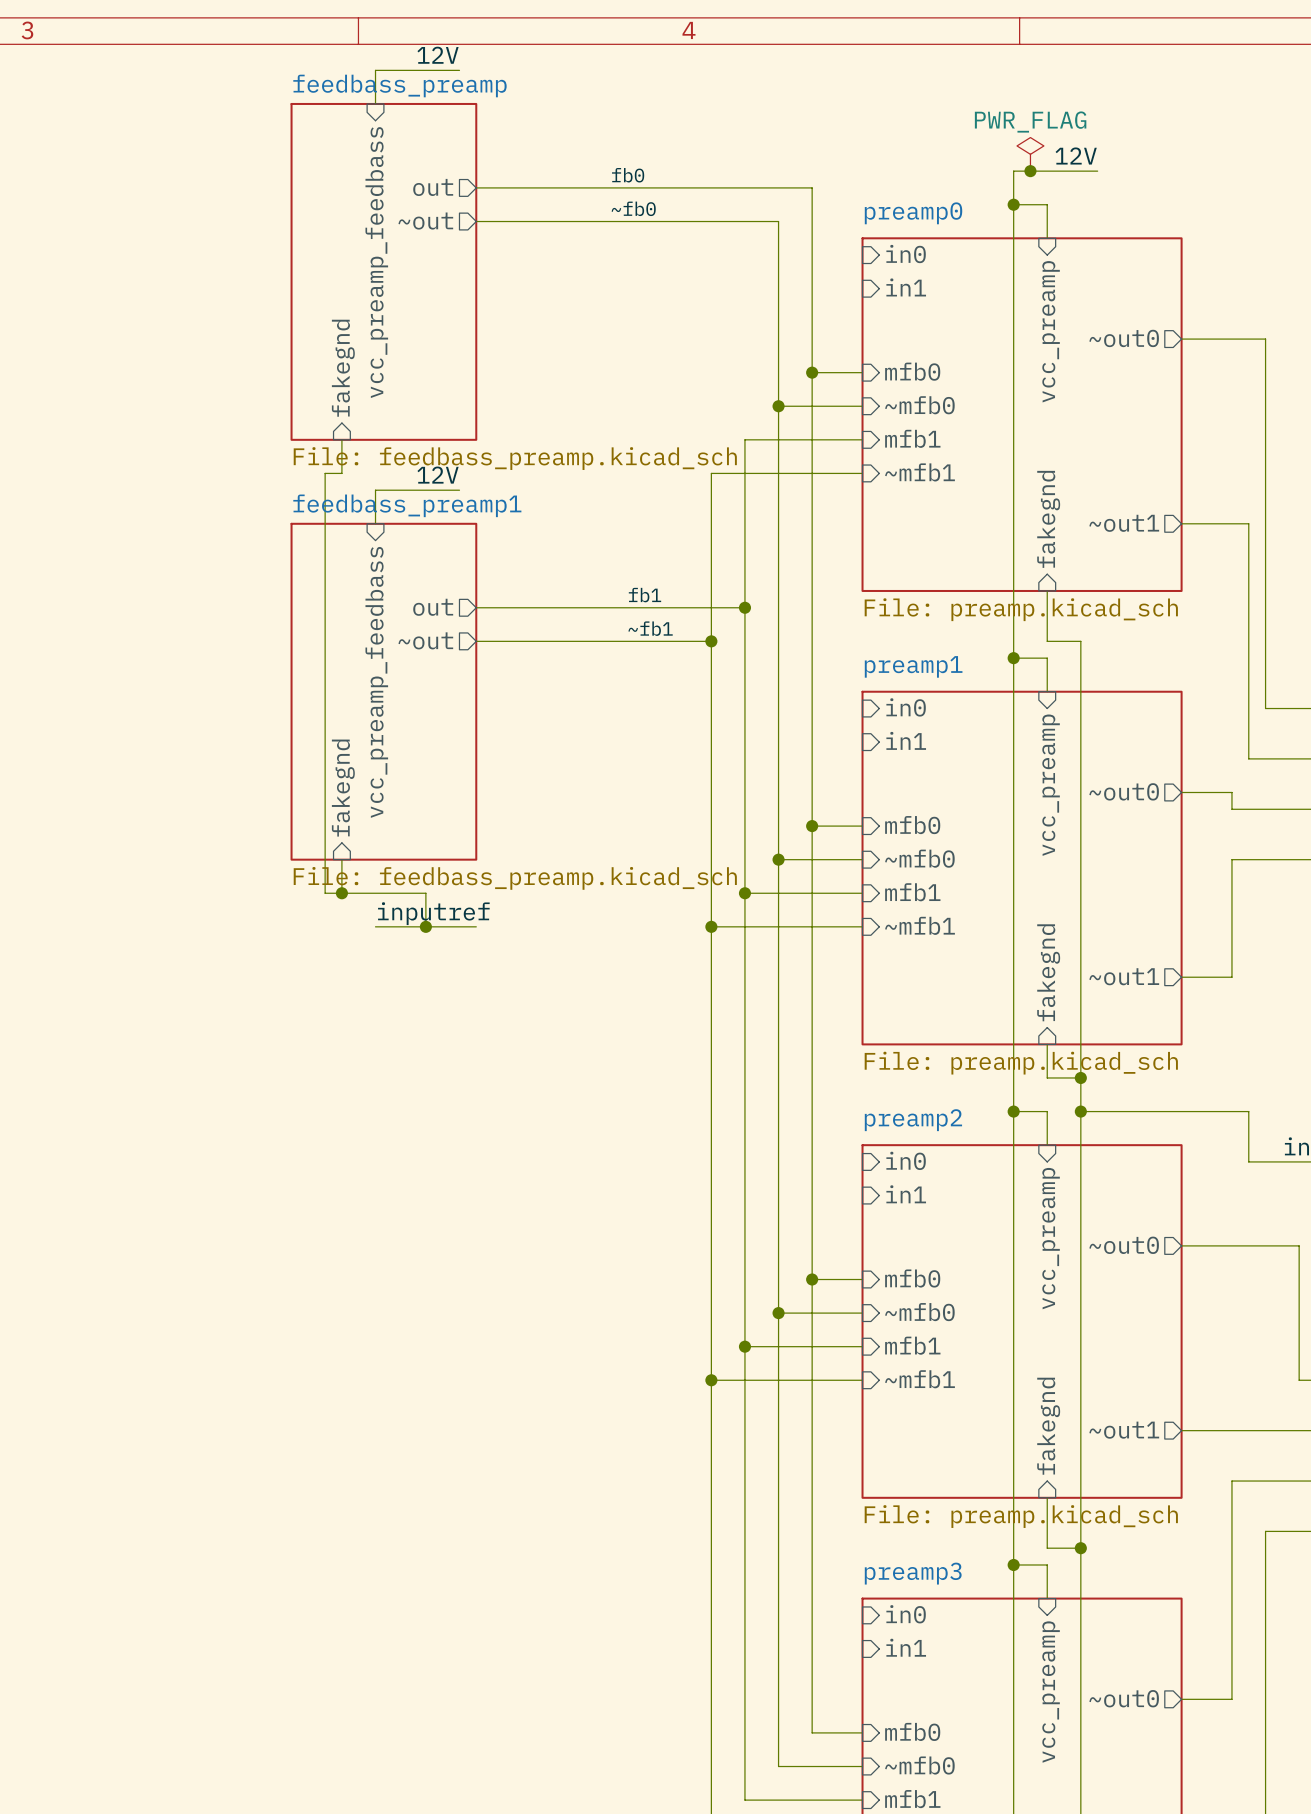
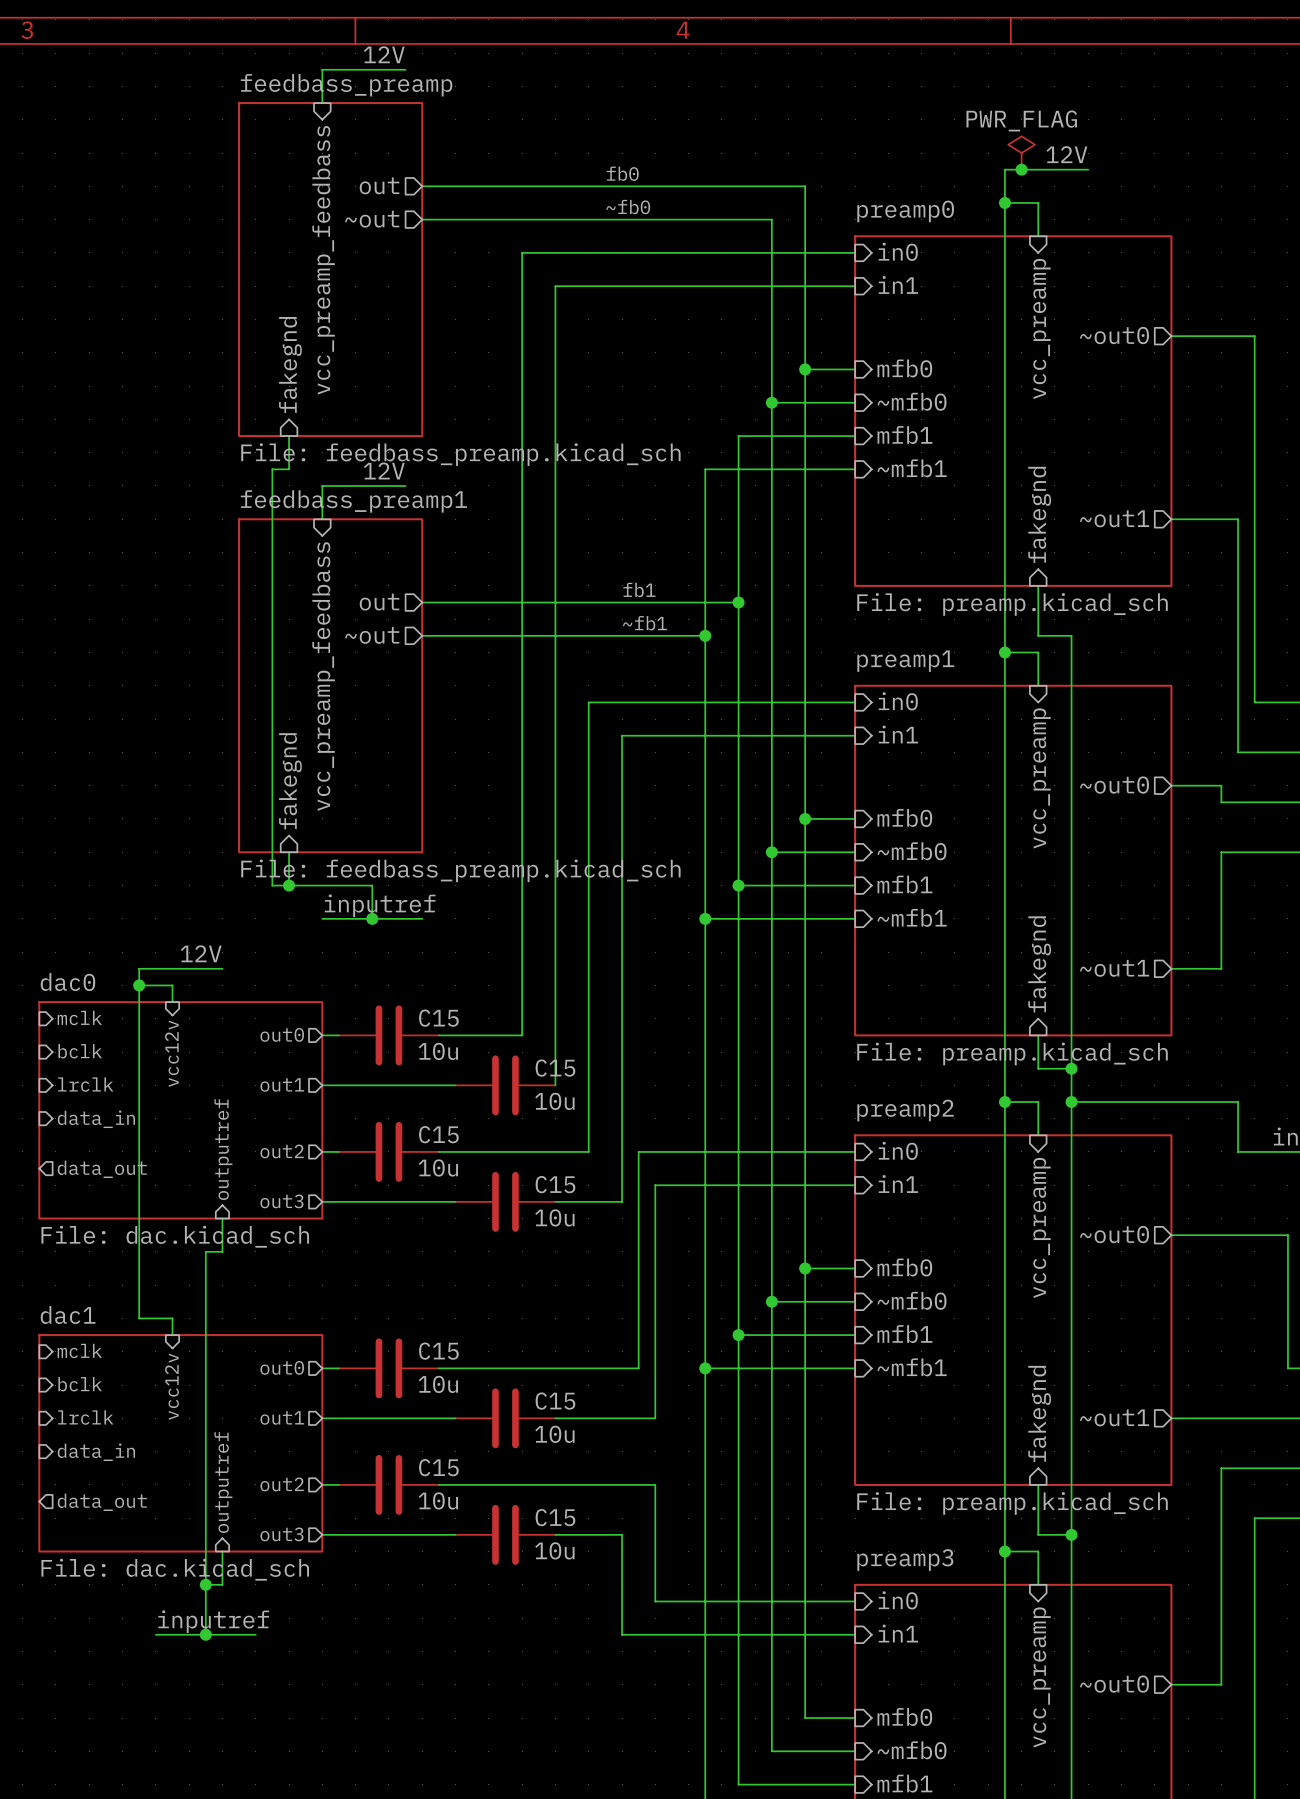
label position: 12V (438, 55) -> 12V (384, 54)
wire: (375, 70) (375, 103) -> (372, 69) (322, 69) (322, 103)
wire: (409, 70) (459, 70) -> (422, 186) (472, 186)
sheet pin position: out (433, 187) -> out (379, 185)
wire: none -> (422, 219) (472, 219)
sheet pin position: ~out (425, 221) -> ~out (372, 219)
wire: none -> (855, 252) (522, 252) (522, 1035) (438, 1035)
sheet pin position: vcc_preamp_feedbass (376, 262) -> vcc_preamp_feedbass (323, 260)
sheet feedbass_preamp position: (383, 271) -> (330, 269)
wire: none -> (855, 286) (555, 286) (555, 1085)
sheet pin position: fakegnd (343, 368) -> fakegnd (290, 365)
wire: (341, 439) (341, 473) (325, 473) (325, 490) -> (372, 485) (322, 485)
label position: 12V (438, 475) -> 12V (384, 470)
wire: (375, 490) (375, 523) -> none
wire: (409, 490) (459, 490) -> (422, 602) (472, 602)
wire: (325, 523) (325, 893) -> (289, 436) (289, 469) (272, 469) (272, 885) (322, 885)
sheet pin position: out (433, 607) -> out (379, 602)
sheet pin position: ~out (425, 640) -> ~out (372, 635)
wire: none -> (422, 635) (472, 635)
sheet pin position: vcc_preamp_feedbass (376, 682) -> vcc_preamp_feedbass (323, 676)
sheet feedbass_preamp1 position: (383, 691) -> (330, 685)
wire: none -> (855, 702) (588, 702) (588, 1151) (438, 1151)
wire: none -> (855, 735) (622, 735) (622, 1201) (555, 1201)
sheet pin position: fakegnd (343, 788) -> fakegnd (290, 781)
wire: (341, 859) (341, 893) -> (289, 852) (289, 885)
junction: none -> (289, 885)
junction: (341, 893) -> none
wire: (375, 893) (425, 893) (425, 926) (476, 926) -> (372, 885) (372, 918) (322, 918)
label position: inputref (433, 913) -> inputref (380, 905)
junction: none -> (372, 918)
junction: (425, 926) -> none
label: none -> 12V (201, 953)
wire: none -> (222, 968) (139, 968) (139, 1318) (172, 1318) (172, 1335)
wire: none -> (139, 985) (172, 985) (172, 1002)
junction: none -> (139, 985)
sheet pin: none -> mclk (79, 1017)
sheet pin: none -> out0 (282, 1034)
wire: none -> (322, 1035) (338, 1035)
C15: none -> 10u (388, 1035)
sheet pin: none -> bclk (80, 1051)
sheet pin: none -> vcc12v (171, 1053)
sheet pin: none -> lrclk (85, 1084)
sheet pin: none -> out1 (282, 1084)
wire: none -> (322, 1085) (455, 1085)
C15: none -> 10u (505, 1085)
sheet dac0: none -> File: dac.kicad_sch (180, 1110)
sheet pin: none -> data_in (96, 1119)
sheet pin: none -> outputref (223, 1149)
sheet pin: none -> out2 (282, 1151)
wire: none -> (322, 1151) (338, 1151)
C15: none -> 10u (388, 1151)
wire: none -> (855, 1151) (638, 1151) (638, 1368) (438, 1368)
sheet pin: none -> data_out (102, 1169)
wire: none -> (855, 1185) (655, 1185) (655, 1418) (555, 1418)
sheet pin: none -> out3 (281, 1201)
wire: none -> (322, 1201) (455, 1201)
C15: none -> 10u (505, 1201)
wire: none -> (222, 1218) (222, 1251) (205, 1251) (205, 1634)
sheet pin: none -> mclk (79, 1350)
sheet pin: none -> out0 (282, 1367)
wire: none -> (322, 1368) (338, 1368)
C15: none -> 10u (388, 1368)
sheet pin: none -> bclk (80, 1384)
sheet pin: none -> vcc12v (171, 1386)
sheet pin: none -> lrclk (85, 1417)
sheet pin: none -> out1 (282, 1417)
wire: none -> (322, 1418) (455, 1418)
C15: none -> 10u (505, 1418)
sheet dac1: none -> File: dac.kicad_sch (180, 1443)
sheet pin: none -> data_in (96, 1452)
sheet pin: none -> outputref (223, 1482)
sheet pin: none -> out2 (282, 1484)
wire: none -> (322, 1484) (338, 1484)
C15: none -> 10u (388, 1484)
wire: none -> (438, 1484) (655, 1484) (655, 1601) (855, 1601)
sheet pin: none -> data_out (102, 1502)
sheet pin: none -> out3 (281, 1534)
wire: none -> (322, 1534) (455, 1534)
C15: none -> 10u (505, 1534)
wire: none -> (555, 1534) (622, 1534) (622, 1634) (855, 1634)
wire: none -> (222, 1551) (222, 1584) (205, 1584)
junction: none -> (205, 1584)
label: none -> inputref (213, 1621)
wire: none -> (155, 1634) (255, 1634)
junction: none -> (205, 1634)

